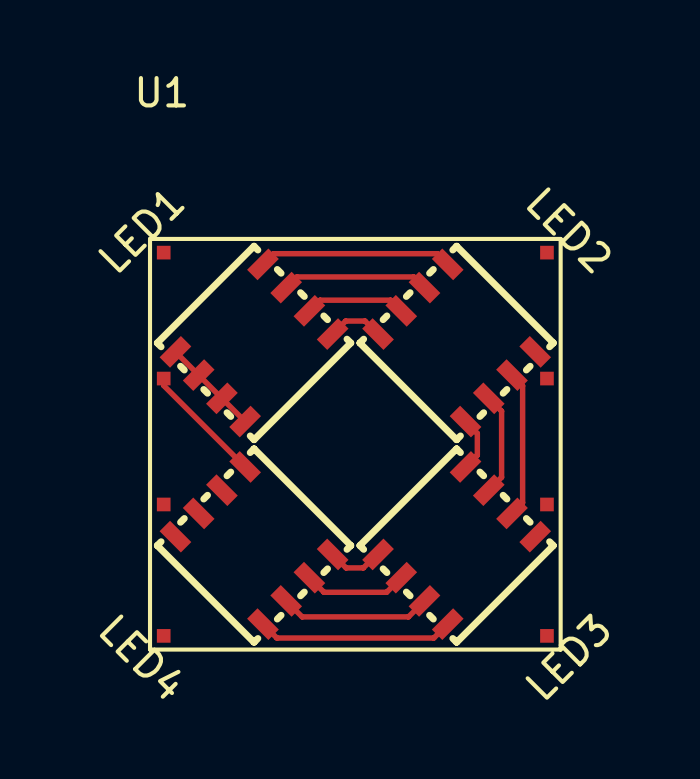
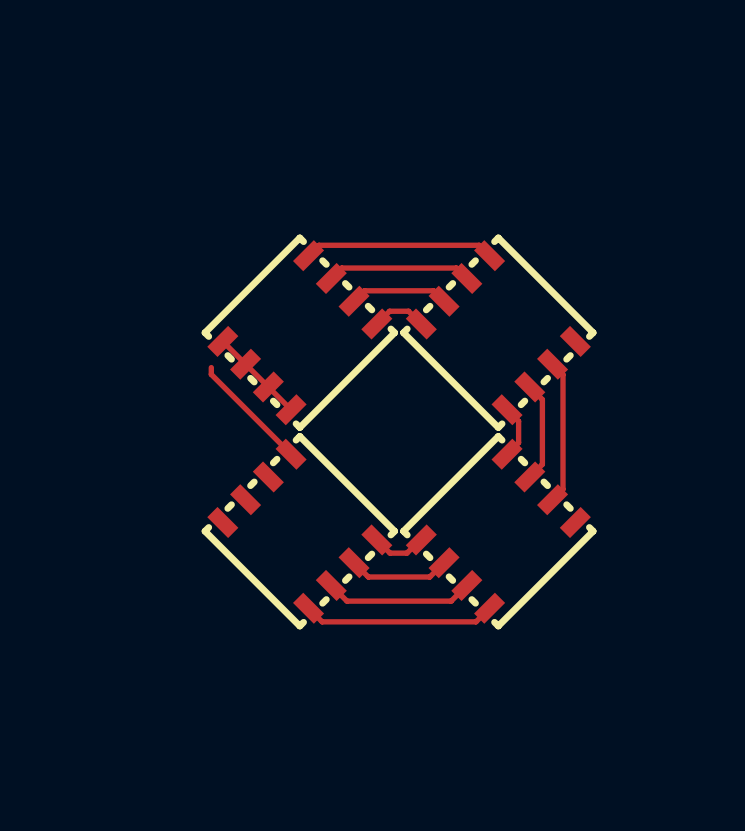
LED2 name: LED2 (568, 230) -> none
LED1 name: LED1 (141, 232) -> none
U1: (355, 444) -> none
LED4 name: LED4 (140, 656) -> none
LED3 name: LED3 (567, 656) -> none

